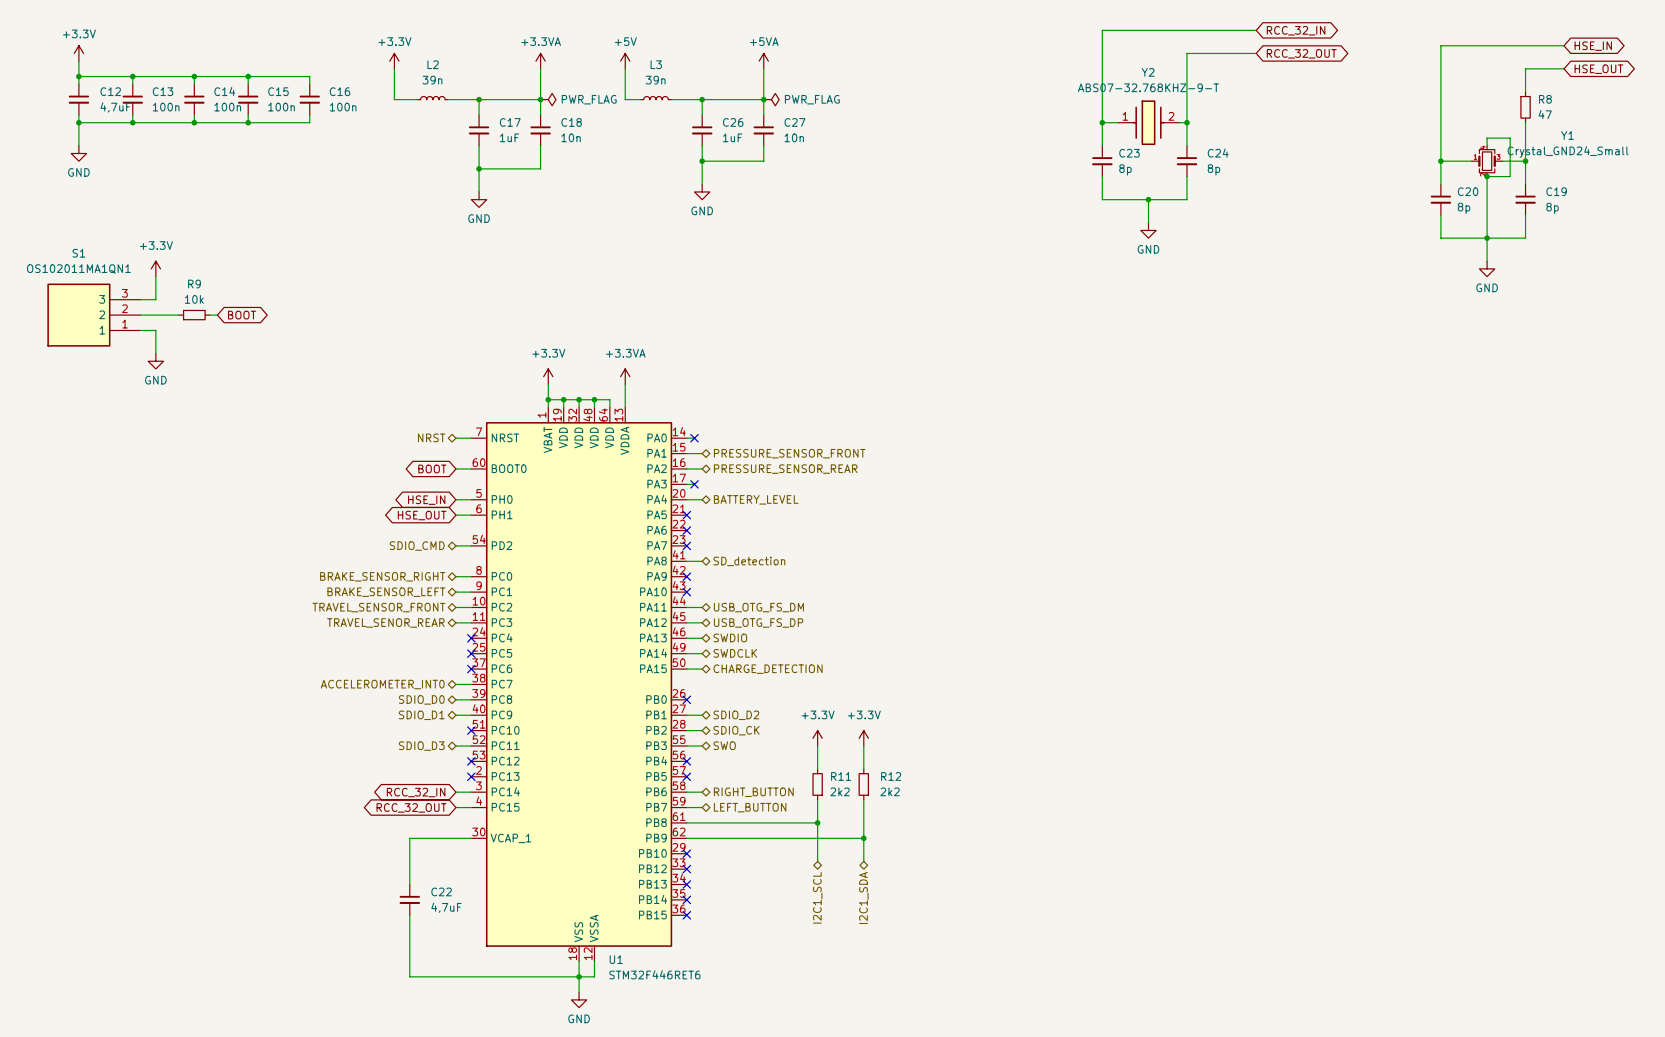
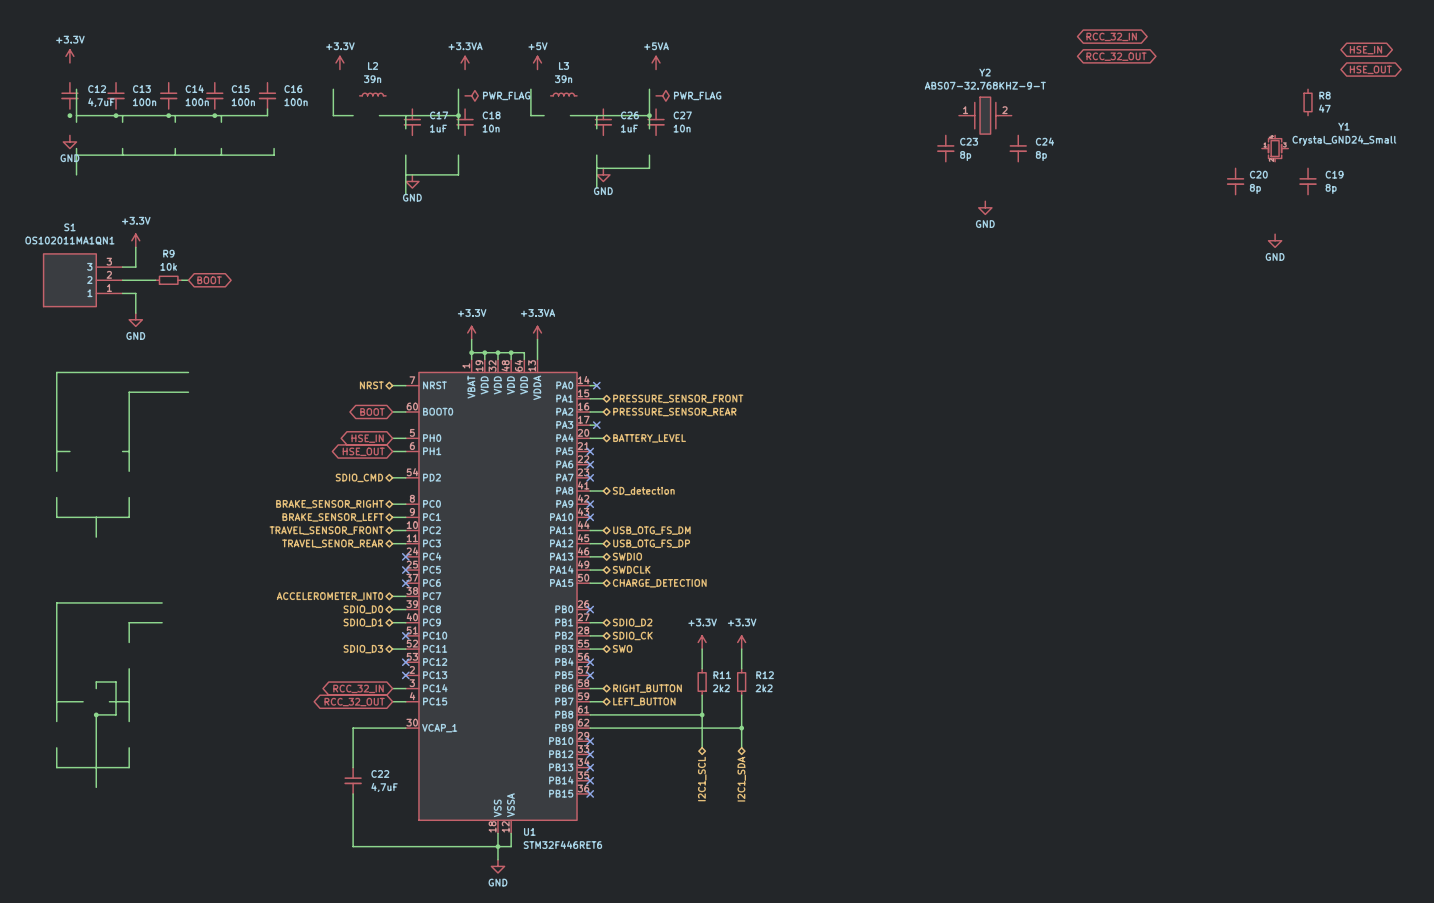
wire: (1256, 30) (1102, 30) (1102, 145) -> none
wire: (1564, 45) (1440, 45) (1440, 184) -> none
wire: (1256, 53) (1186, 53) (1186, 145) -> none
wire: (78, 61) (78, 84) -> none
wire: (394, 68) (394, 99) (417, 99) -> (333, 89) (333, 115) (353, 115)
wire: (540, 68) (540, 115) -> (458, 89) (458, 128)
wire: (625, 68) (625, 99) (640, 99) -> (530, 89) (530, 115) (544, 115)
wire: (763, 68) (763, 115) -> (649, 89) (649, 128)
wire: (1564, 68) (1525, 68) (1525, 91) -> none
wire: (78, 76) (309, 76) (309, 84) -> none
junction: (78, 76) -> none
wire: (132, 76) (132, 84) -> (122, 115) (122, 122)
junction: (132, 76) -> none
wire: (194, 76) (194, 84) -> (175, 115) (175, 122)
junction: (194, 76) -> none
wire: (248, 76) (248, 84) -> (221, 115) (221, 122)
junction: (248, 76) -> none
wire: none -> (76, 89) (76, 122)
wire: (448, 99) (540, 99) -> (379, 115) (458, 115)
wire: (479, 99) (479, 115) -> (405, 115) (405, 128)
junction: (479, 99) -> none
junction position: (540, 99) -> (458, 115)
wire: (671, 99) (763, 99) -> (570, 115) (649, 115)
wire: (702, 99) (702, 115) -> (596, 115) (596, 128)
junction: (702, 99) -> none
junction position: (763, 99) -> (649, 115)
wire: (78, 115) (78, 145) -> (76, 148) (76, 174)
wire: (132, 115) (132, 122) -> (122, 148) (122, 155)
wire: (194, 115) (194, 122) -> (175, 148) (175, 155)
wire: (248, 115) (248, 122) -> (221, 148) (221, 155)
wire: (78, 122) (86, 122) -> none
wire: (1102, 122) (1117, 122) -> none
junction: (1102, 122) -> none
wire: (1179, 122) (1186, 122) -> none
junction: (1186, 122) -> none
wire: (1525, 122) (1525, 184) -> none
wire: (479, 145) (479, 191) -> (405, 155) (405, 194)
wire: (540, 145) (540, 168) (479, 168) -> (458, 155) (458, 174) (405, 174)
wire: (702, 145) (702, 184) -> (596, 155) (596, 188)
wire: (763, 145) (763, 161) (702, 161) -> (649, 155) (649, 168) (596, 168)
wire: (1487, 145) (1487, 138) (1510, 138) (1510, 176) (1487, 176) (1487, 261) -> none
wire: none -> (274, 148) (274, 155) (76, 155)
junction: (702, 161) -> none
wire: (1440, 161) (1471, 161) -> none
junction: (1440, 161) -> none
wire: (1502, 161) (1525, 161) -> none
junction: (1525, 161) -> none
junction: (479, 168) -> none
wire: (1102, 176) (1102, 199) (1186, 199) (1186, 176) -> none
junction: (1487, 176) -> none
wire: (1148, 199) (1148, 222) -> none
junction: (1148, 199) -> none
wire: (1440, 215) (1440, 238) (1525, 238) (1525, 215) -> none
junction: (1487, 238) -> none
wire: none -> (188, 372) (56, 372) (56, 471)
wire: none -> (188, 392) (129, 392) (129, 471)
wire: none -> (56, 451) (69, 451)
wire: none -> (122, 451) (129, 451)
wire: none -> (56, 497) (56, 517) (129, 517) (129, 497)
wire: none -> (96, 517) (96, 537)
wire: none -> (162, 602) (56, 602) (56, 721)
wire: none -> (162, 622) (129, 622) (129, 642)
wire: none -> (129, 668) (129, 721)
wire: none -> (96, 688) (96, 681) (116, 681) (116, 714) (96, 714) (96, 787)
wire: none -> (56, 701) (83, 701)
wire: none -> (109, 701) (129, 701)
junction: none -> (96, 714)
wire: none -> (56, 747) (56, 767) (129, 767) (129, 747)

